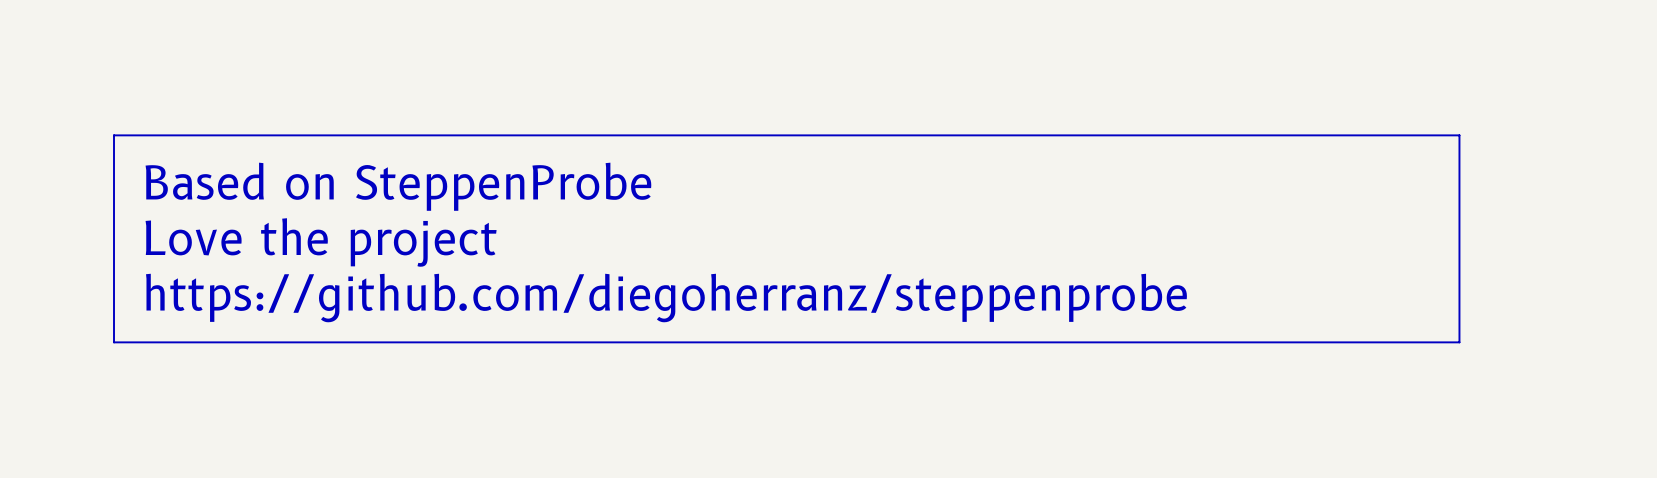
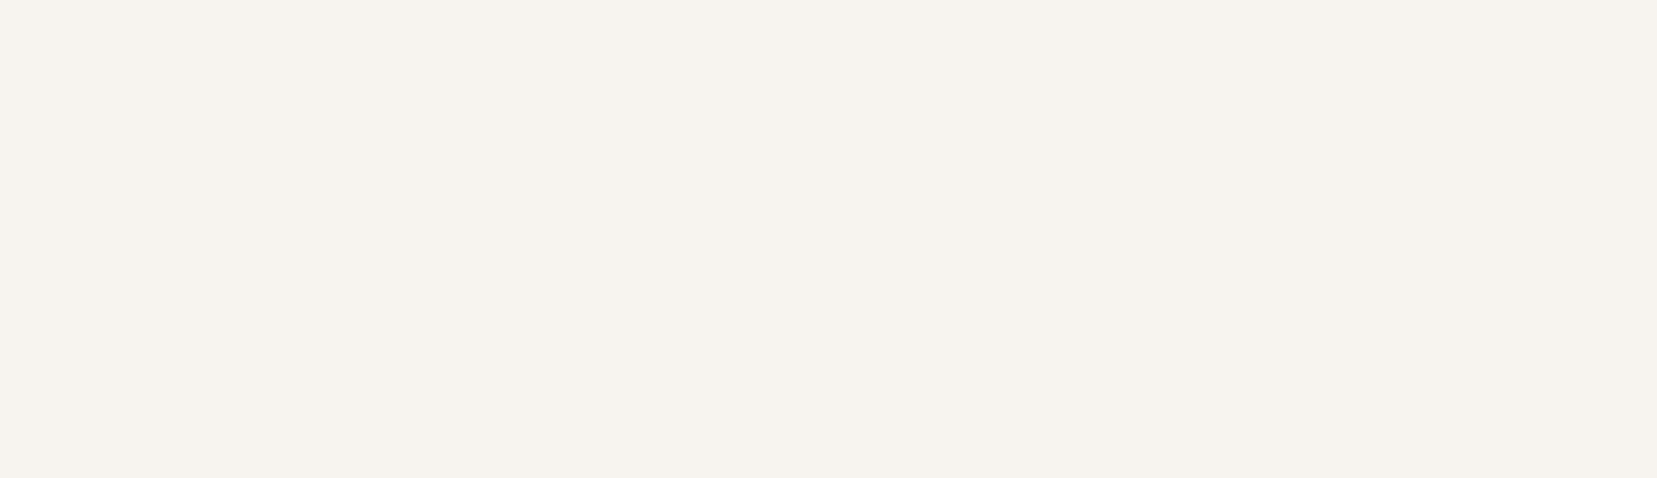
line: (114, 135) (1459, 135) (1459, 342) (114, 342) (114, 135) -> none
text: Based on SteppenProbe (398, 186) -> none
text: Love the project (321, 242) -> none
text: https://github.com/diegoherranz/steppenprobe (666, 298) -> none

